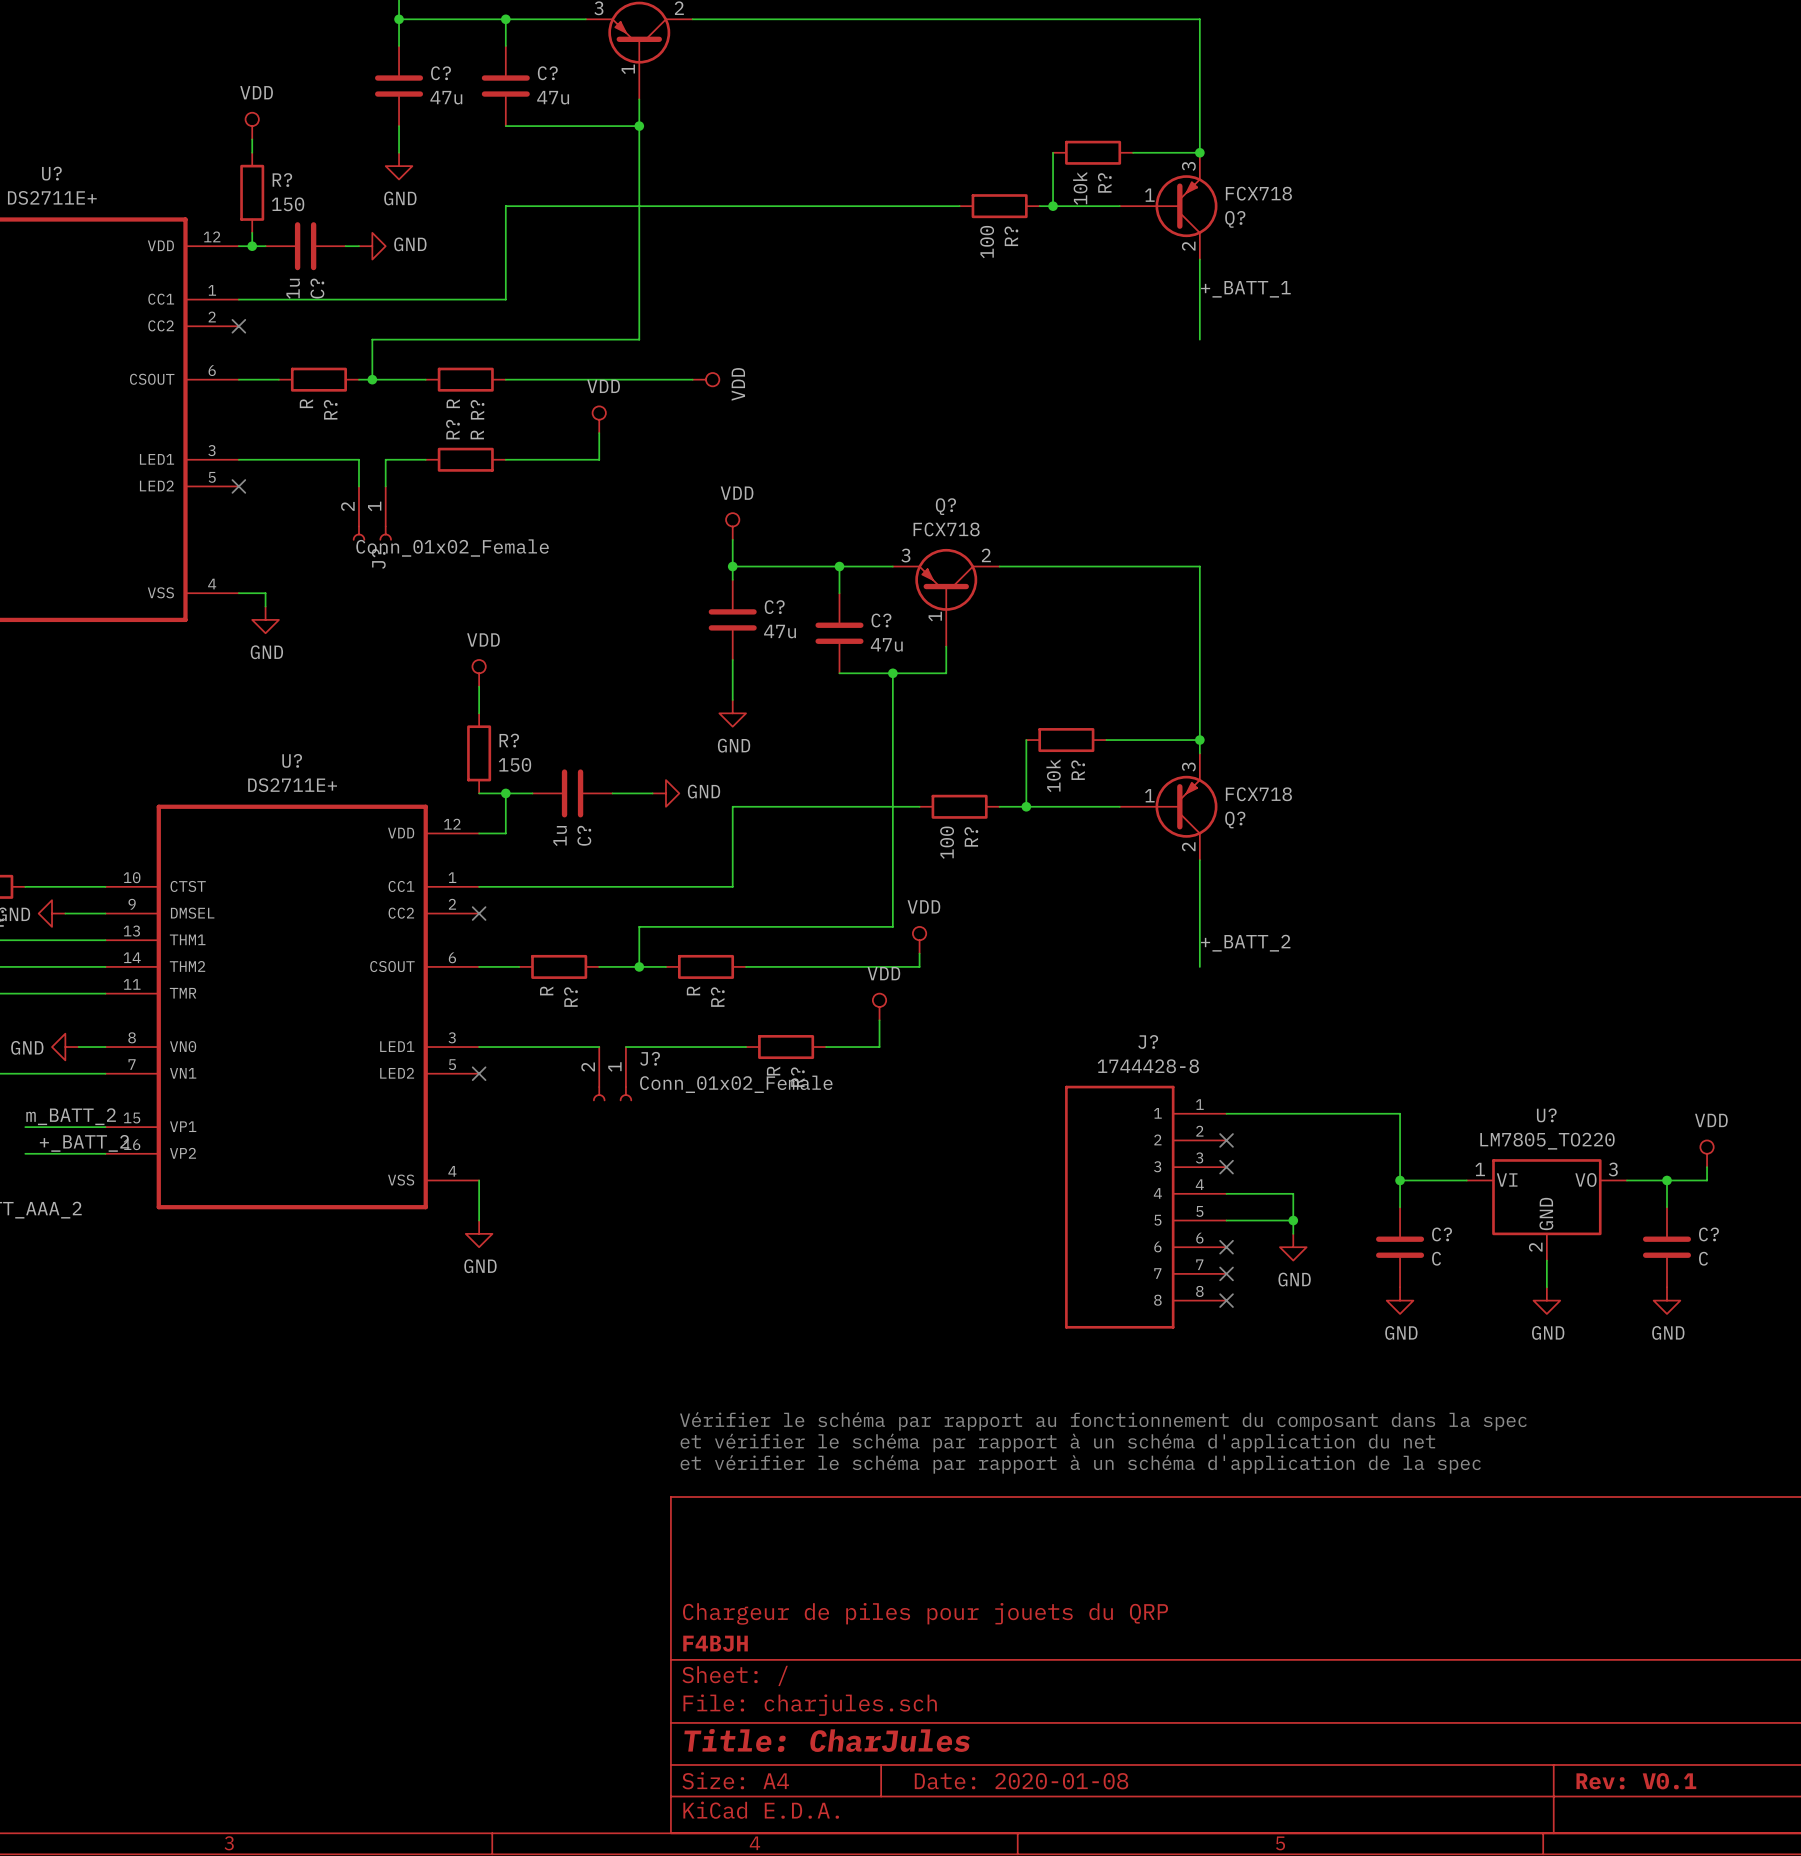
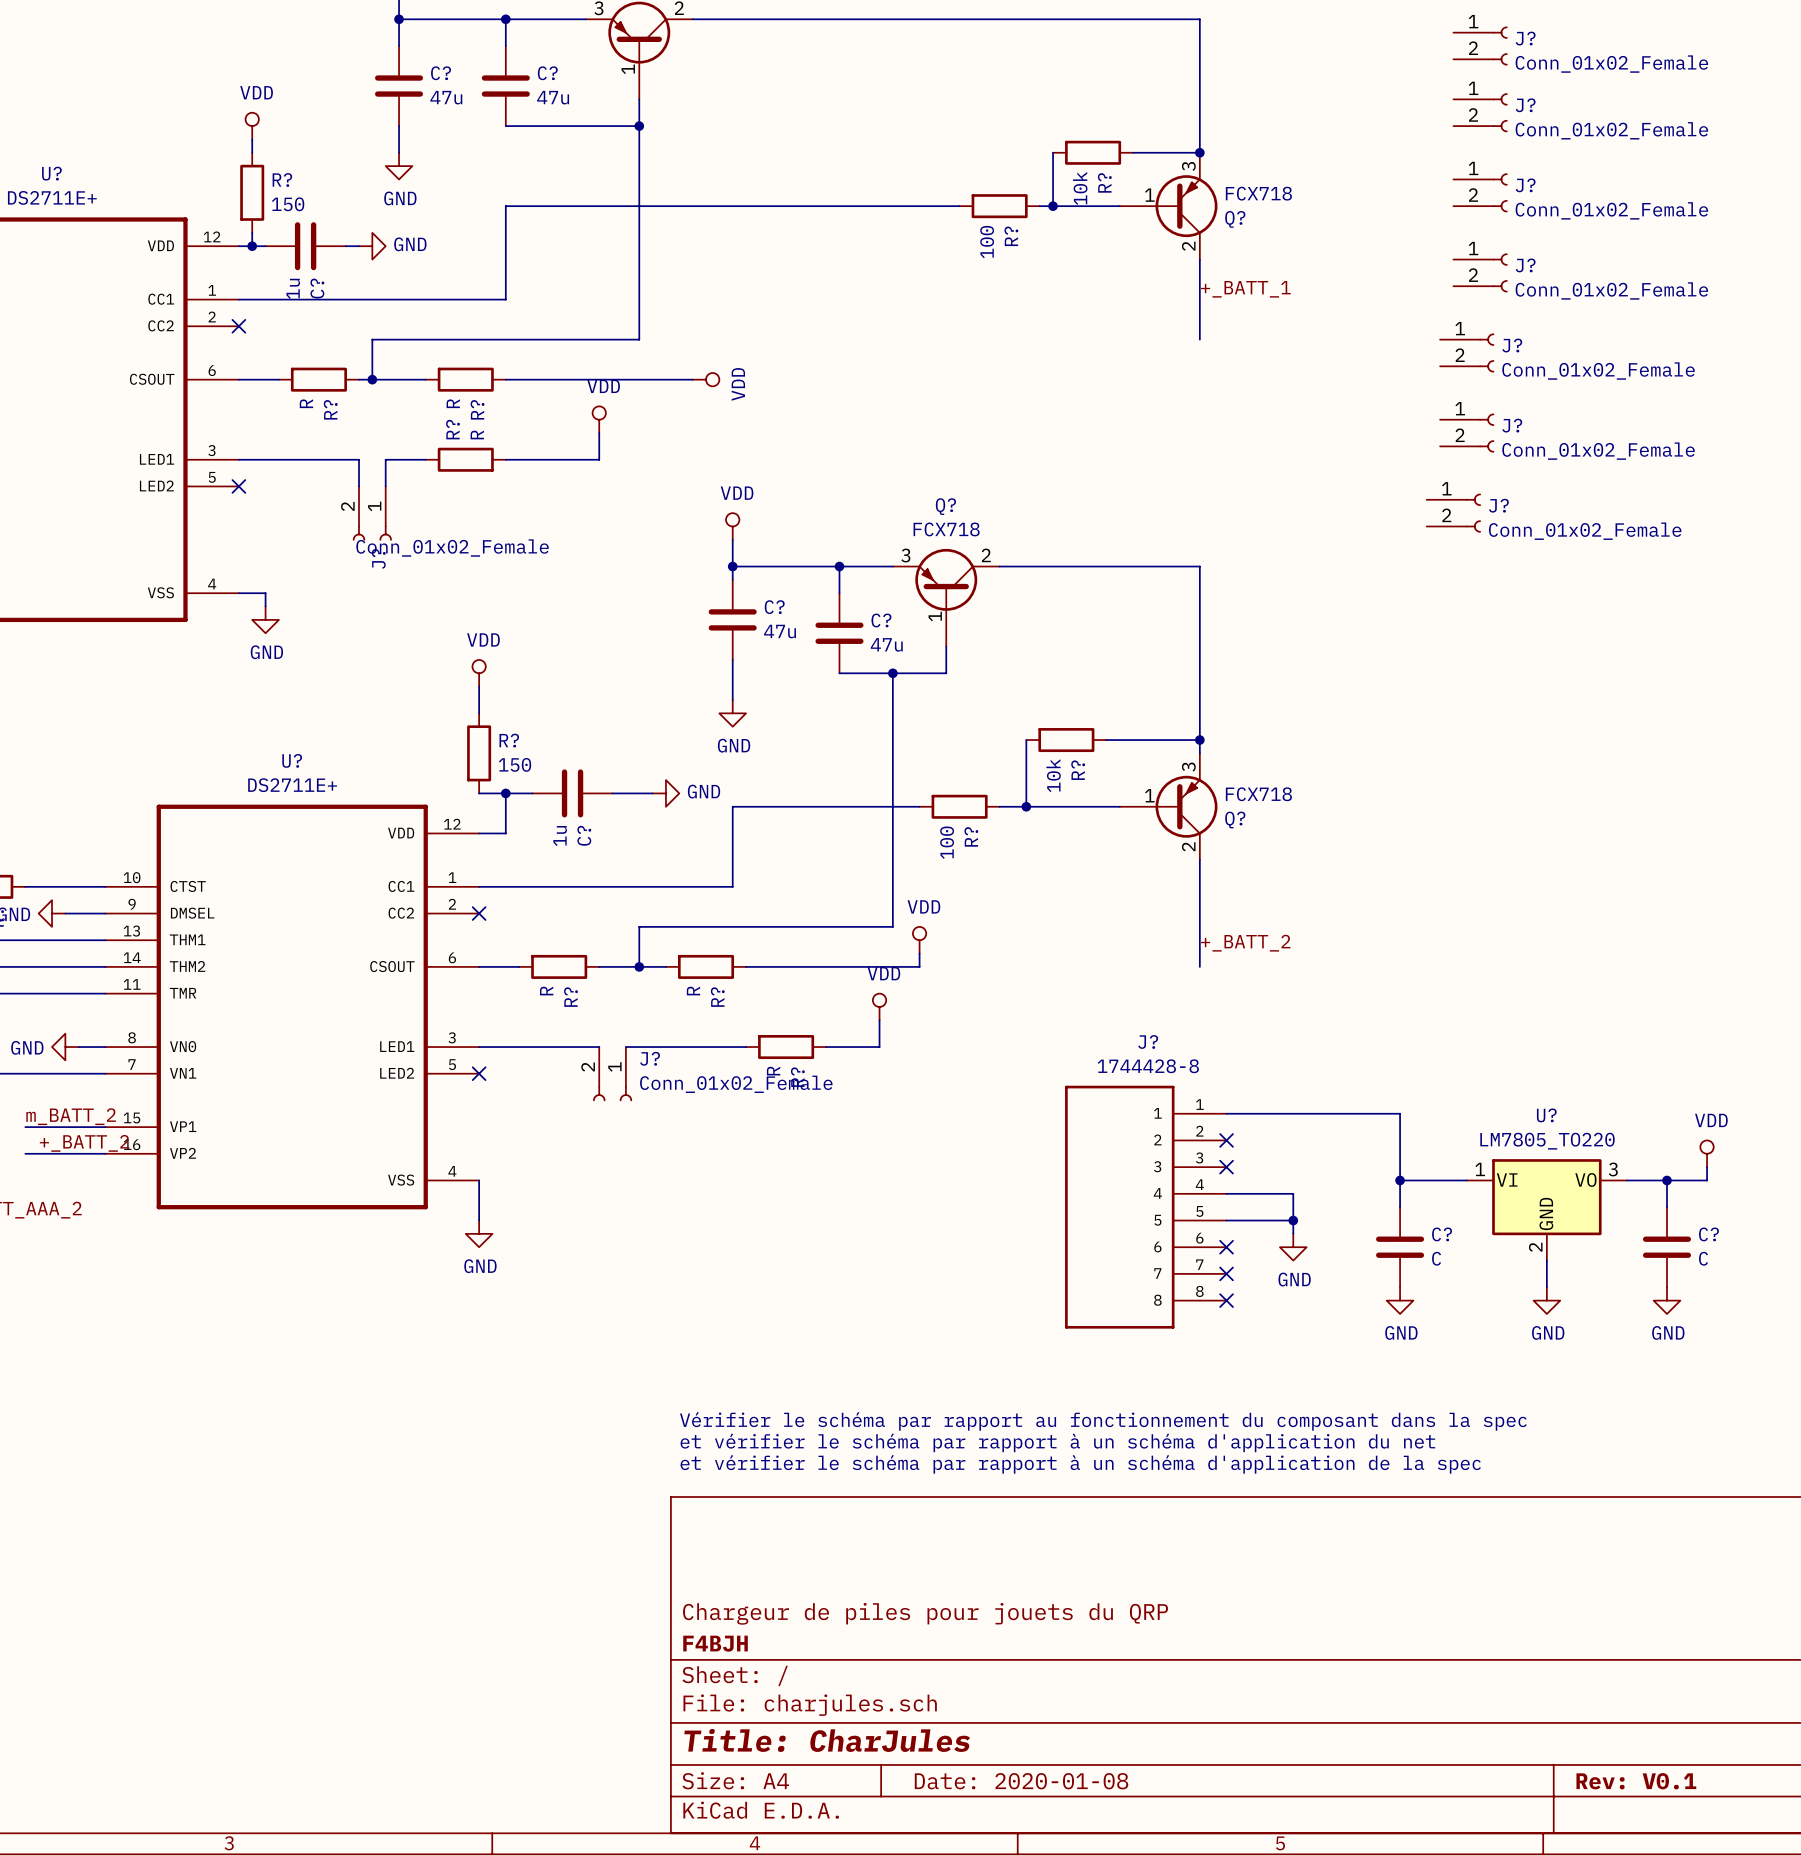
J?: none -> Conn_01x02_Female (1480, 45)
J?: none -> Conn_01x02_Female (1480, 112)
J?: none -> Conn_01x02_Female (1480, 192)
J?: none -> Conn_01x02_Female (1480, 272)
J?: none -> Conn_01x02_Female (1467, 352)
J?: none -> Conn_01x02_Female (1467, 433)
J?: none -> Conn_01x02_Female (1453, 513)

